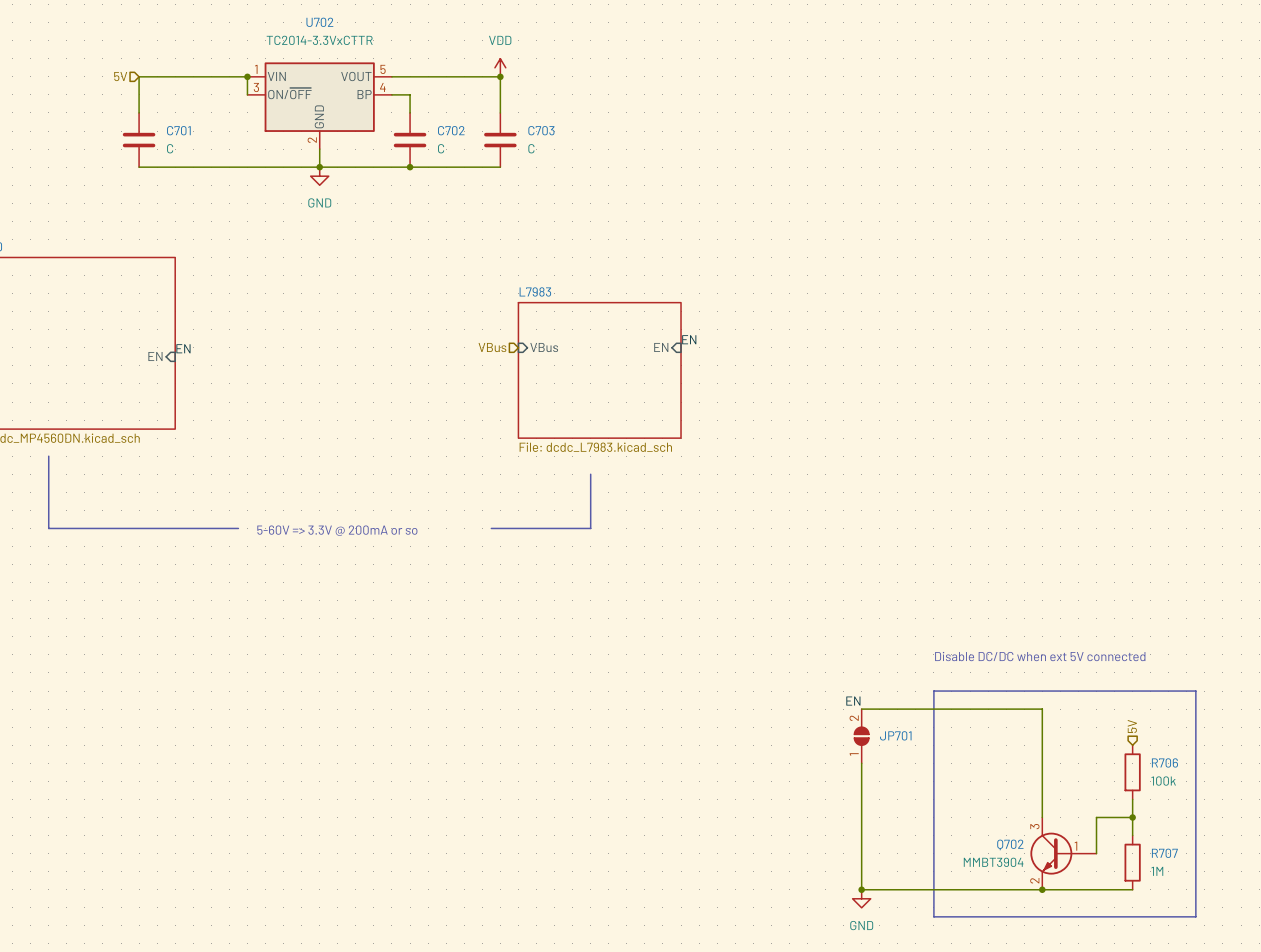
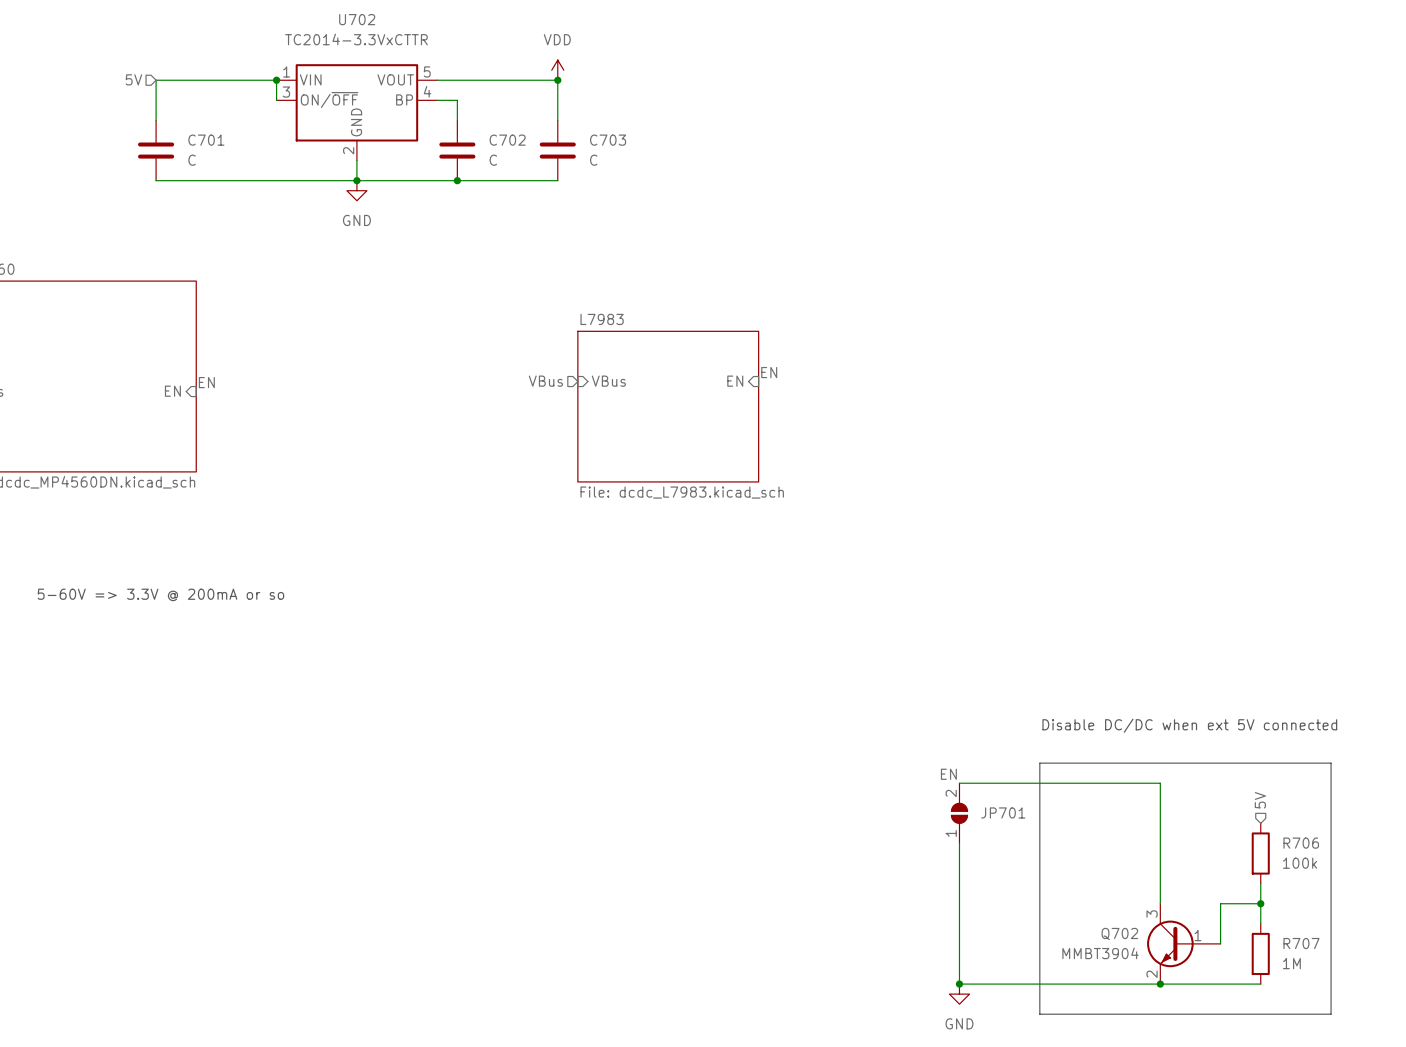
line: (48, 456) (48, 528) (238, 528) -> none
line: (590, 474) (590, 528) (491, 528) -> none
text: 5-60V => 3.3V @ 200mA or so (337, 530) -> none
text: none -> 5-60V => 3.3V @ 200mA or so (160, 594)

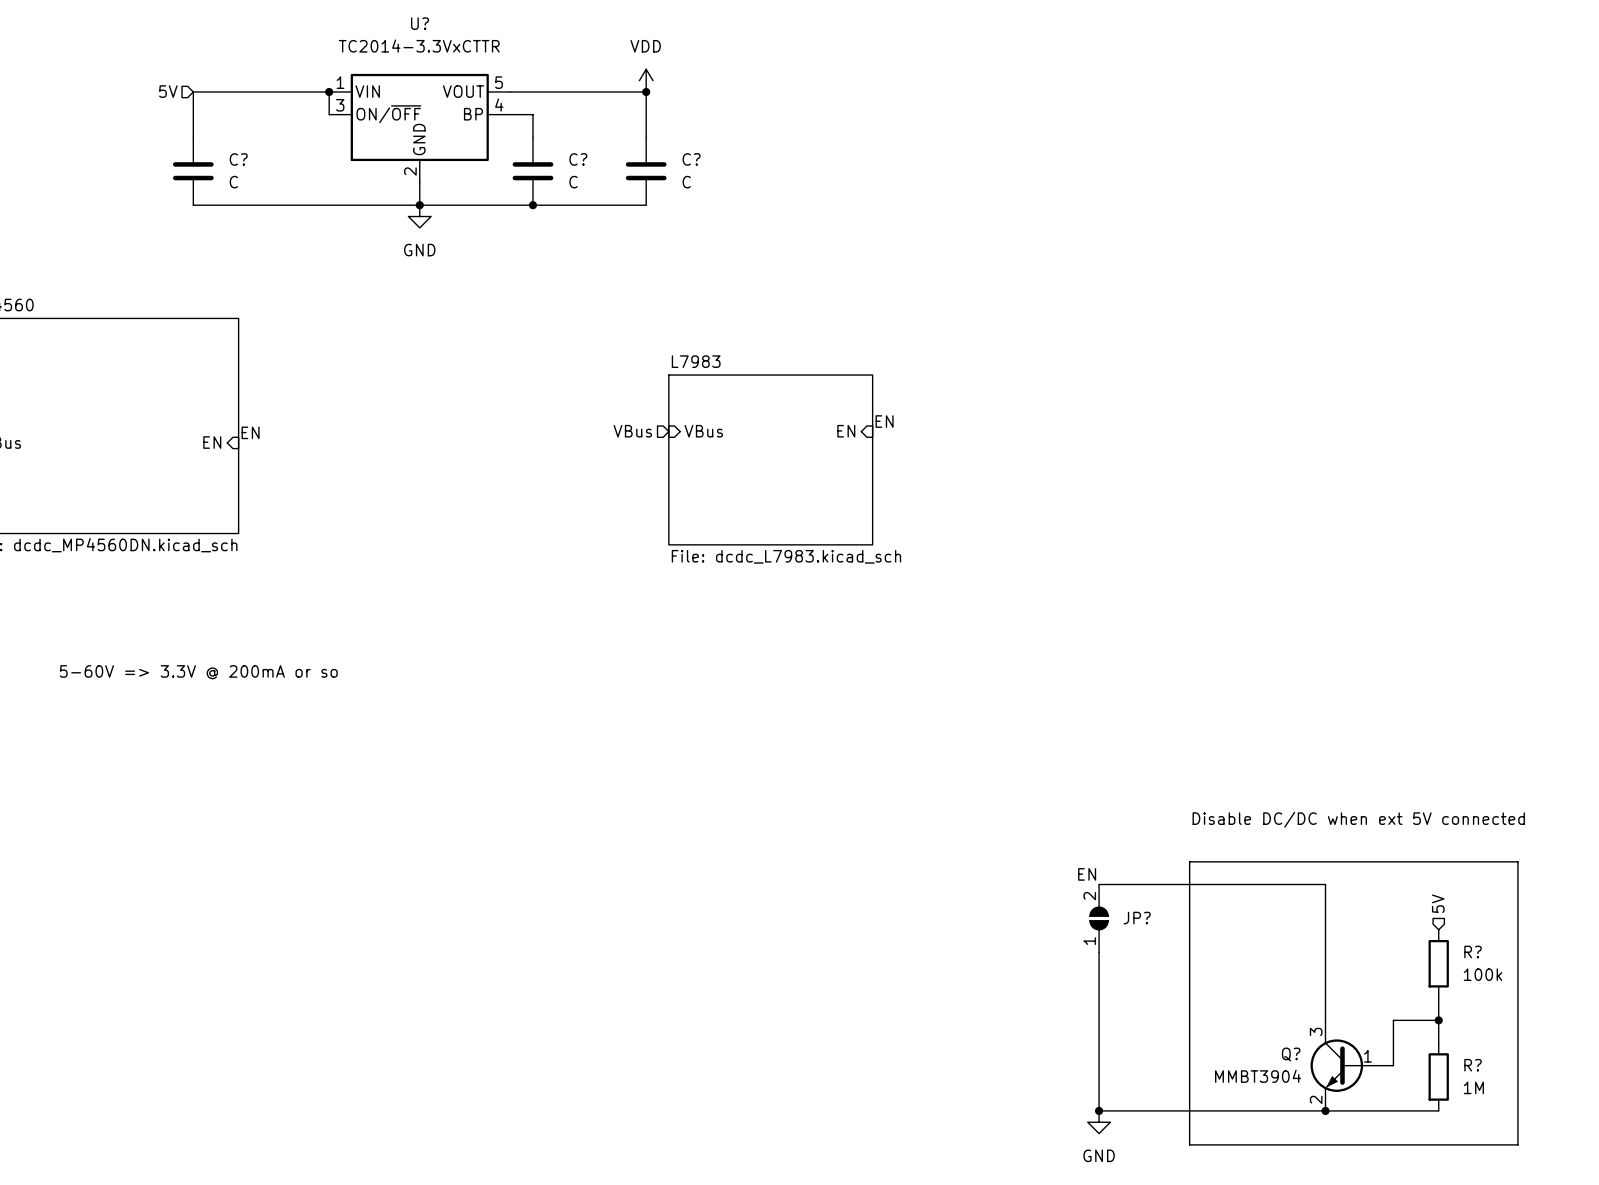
U702 name: U702 (357, 19) -> U? (420, 23)
C701 name: C701 (206, 140) -> C? (238, 159)
C702 name: C702 (507, 140) -> C? (578, 159)
C703 name: C703 (608, 140) -> C? (691, 159)
JP701 name: JP701 (1003, 812) -> JP? (1137, 918)
R706 name: R706 (1301, 843) -> R? (1473, 952)
Q702 name: Q702 (1119, 933) -> Q? (1291, 1054)
R707 name: R707 (1301, 943) -> R? (1473, 1065)

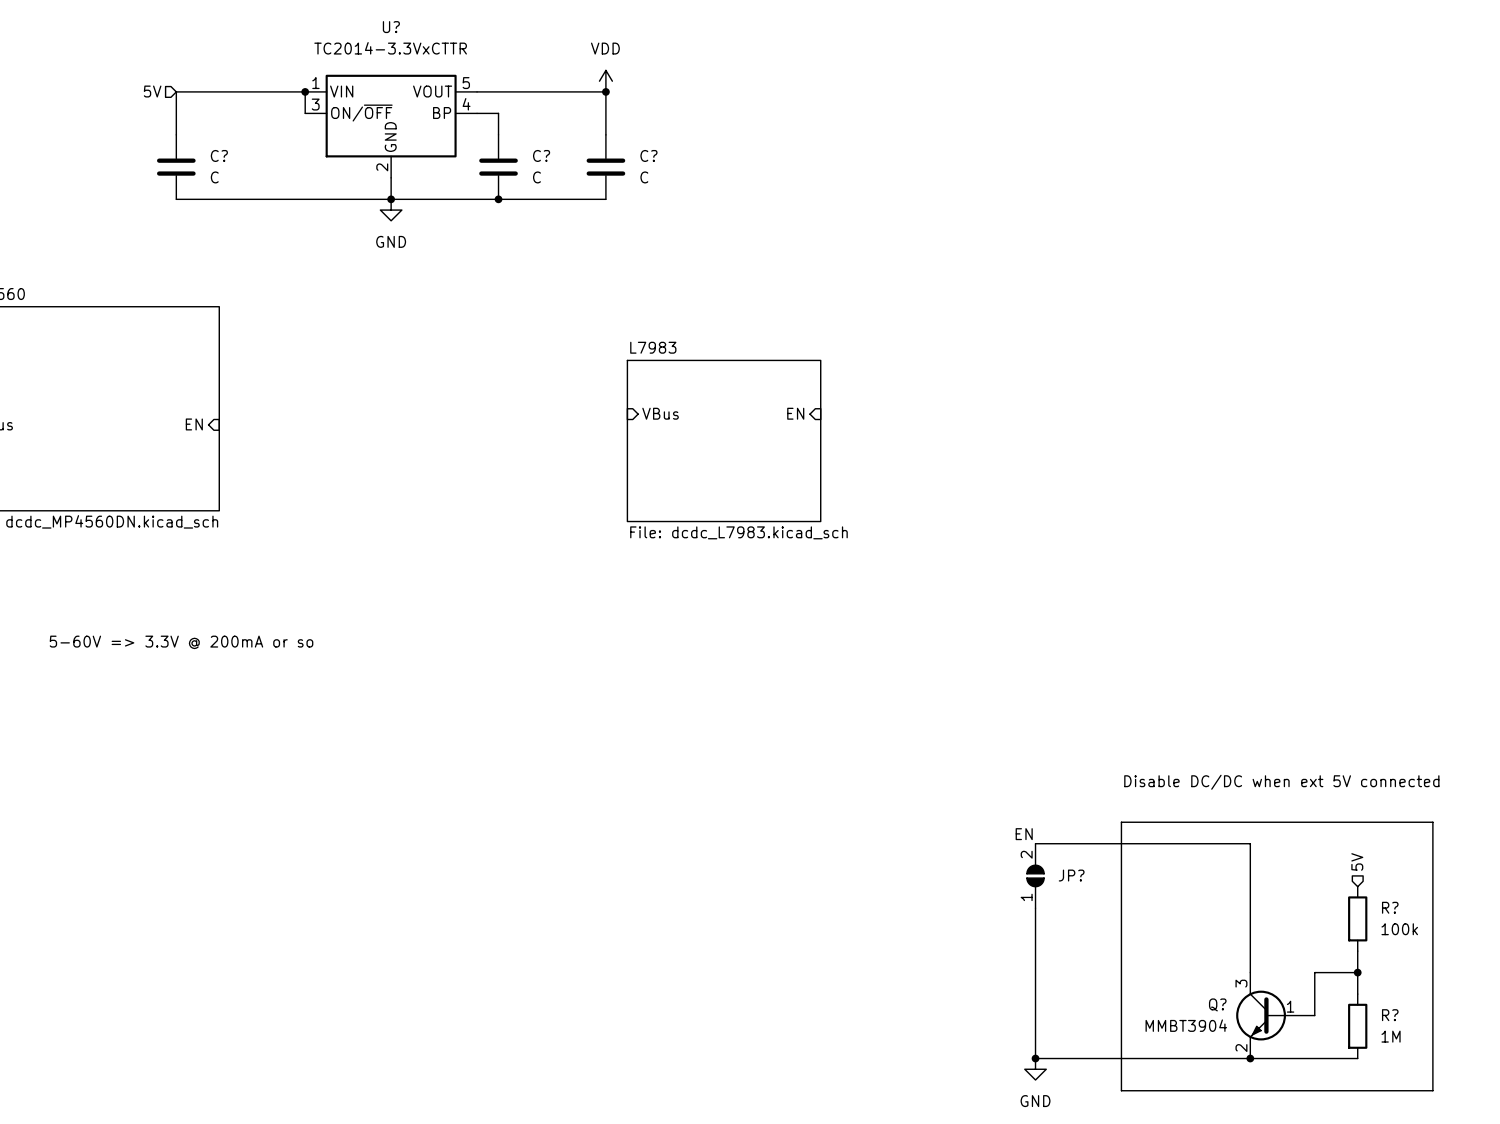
label: EN (884, 421) -> none
hierarchical label: VBus (632, 431) -> none
label: EN (250, 432) -> none

